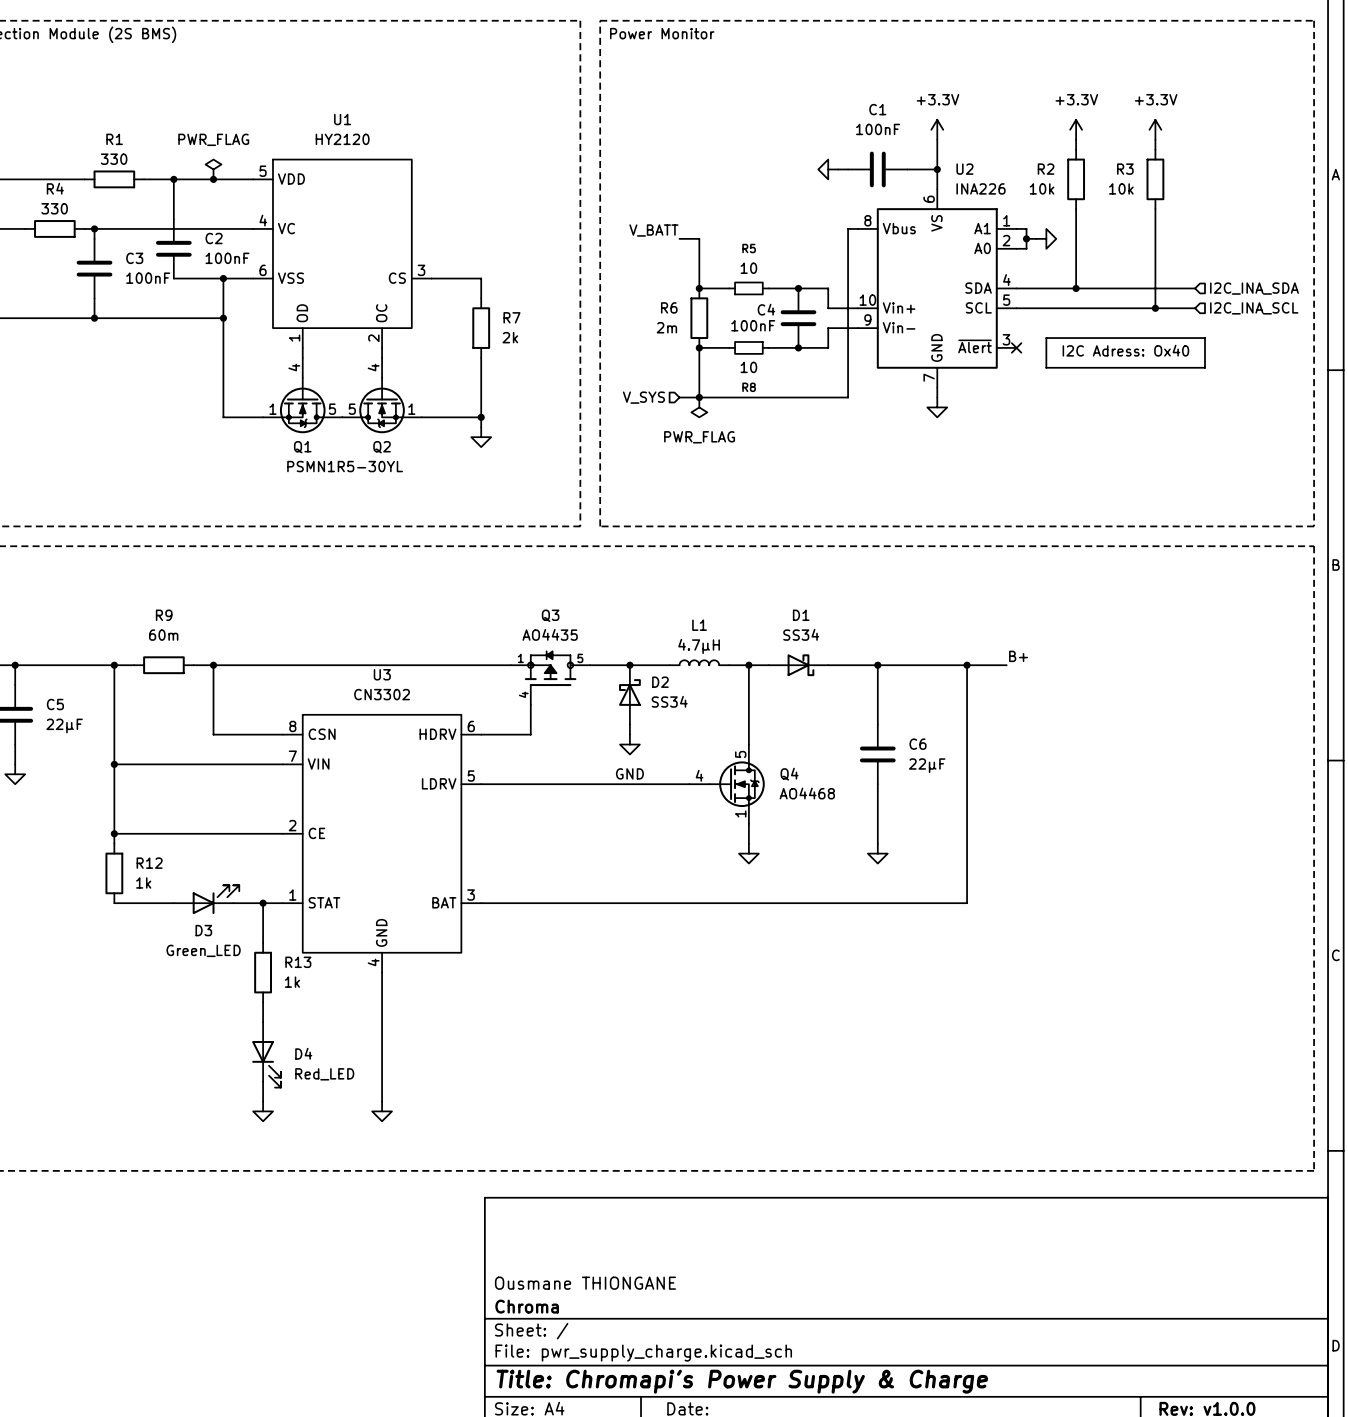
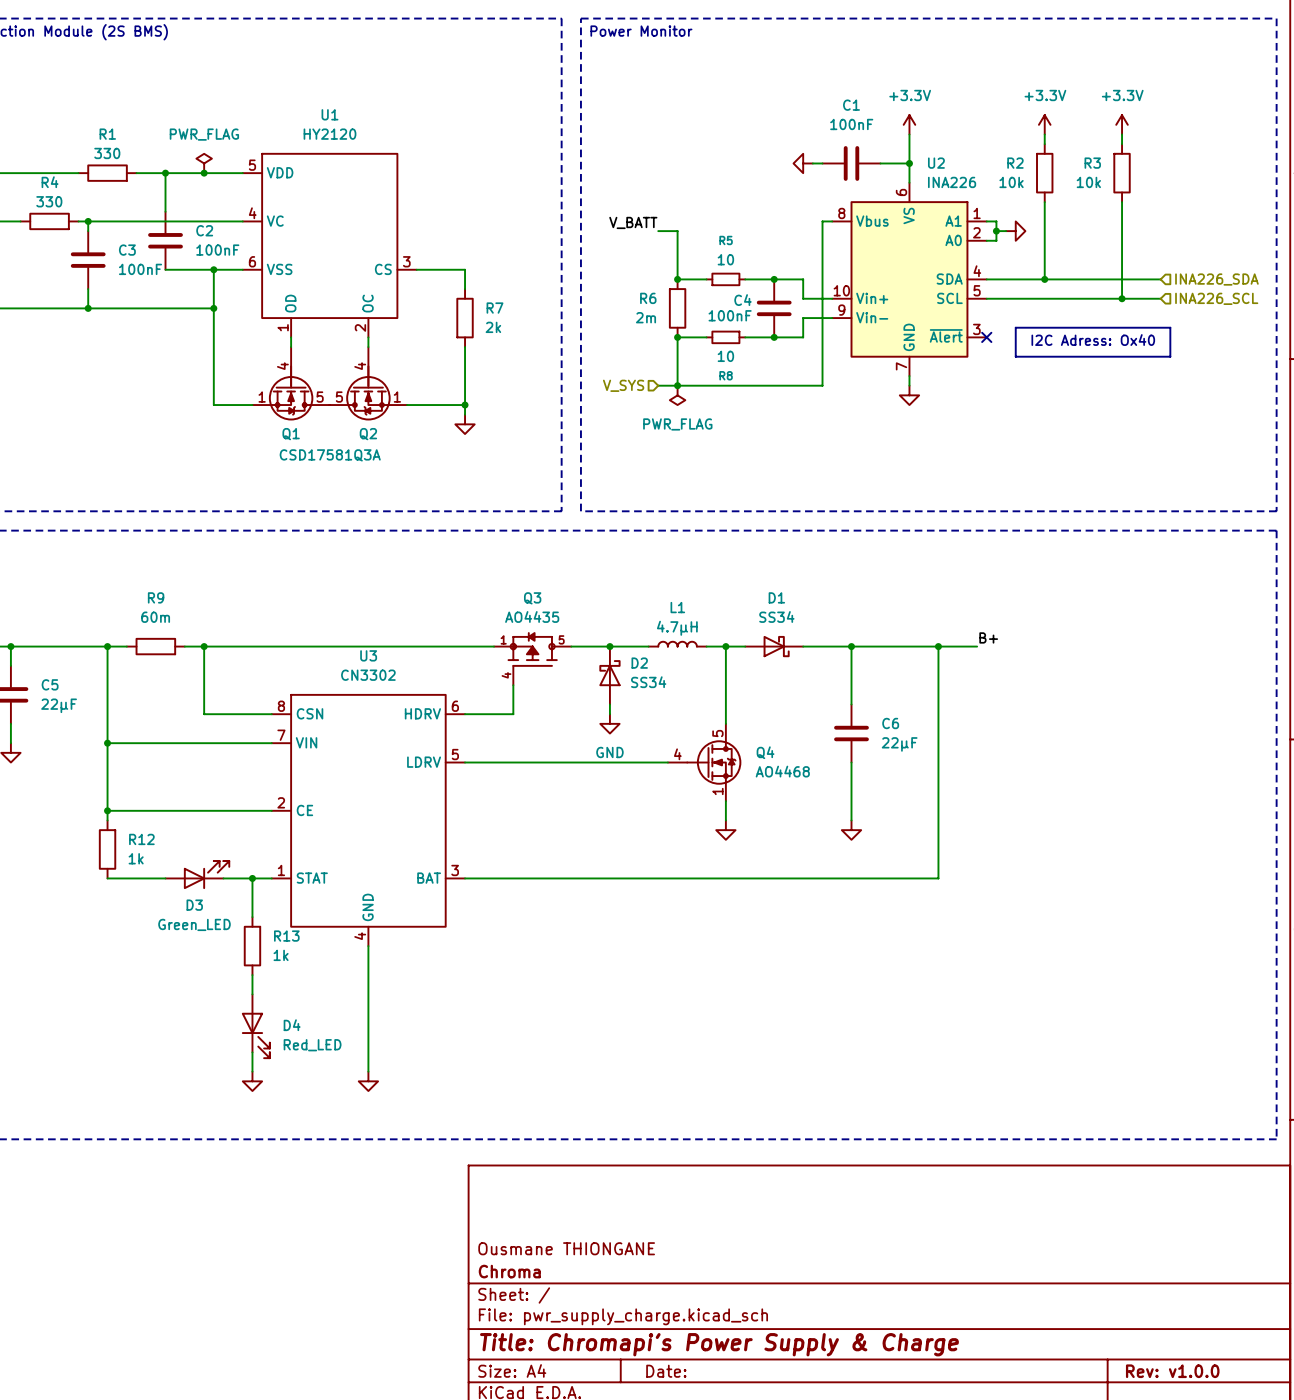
hierarchical label: I2C_INA_SDA (1254, 288) -> INA226_SDA (1216, 279)
hierarchical label: I2C_INA_SCL (1254, 308) -> INA226_SCL (1216, 298)
Q1 symbol: [263, 357, 343, 434] -> [252, 347, 330, 421]
Q2 symbol: [342, 357, 422, 434] -> [329, 347, 408, 421]
Q1 value: PSMN1R5-30YL (345, 466) -> CSD17581Q3A (330, 455)

